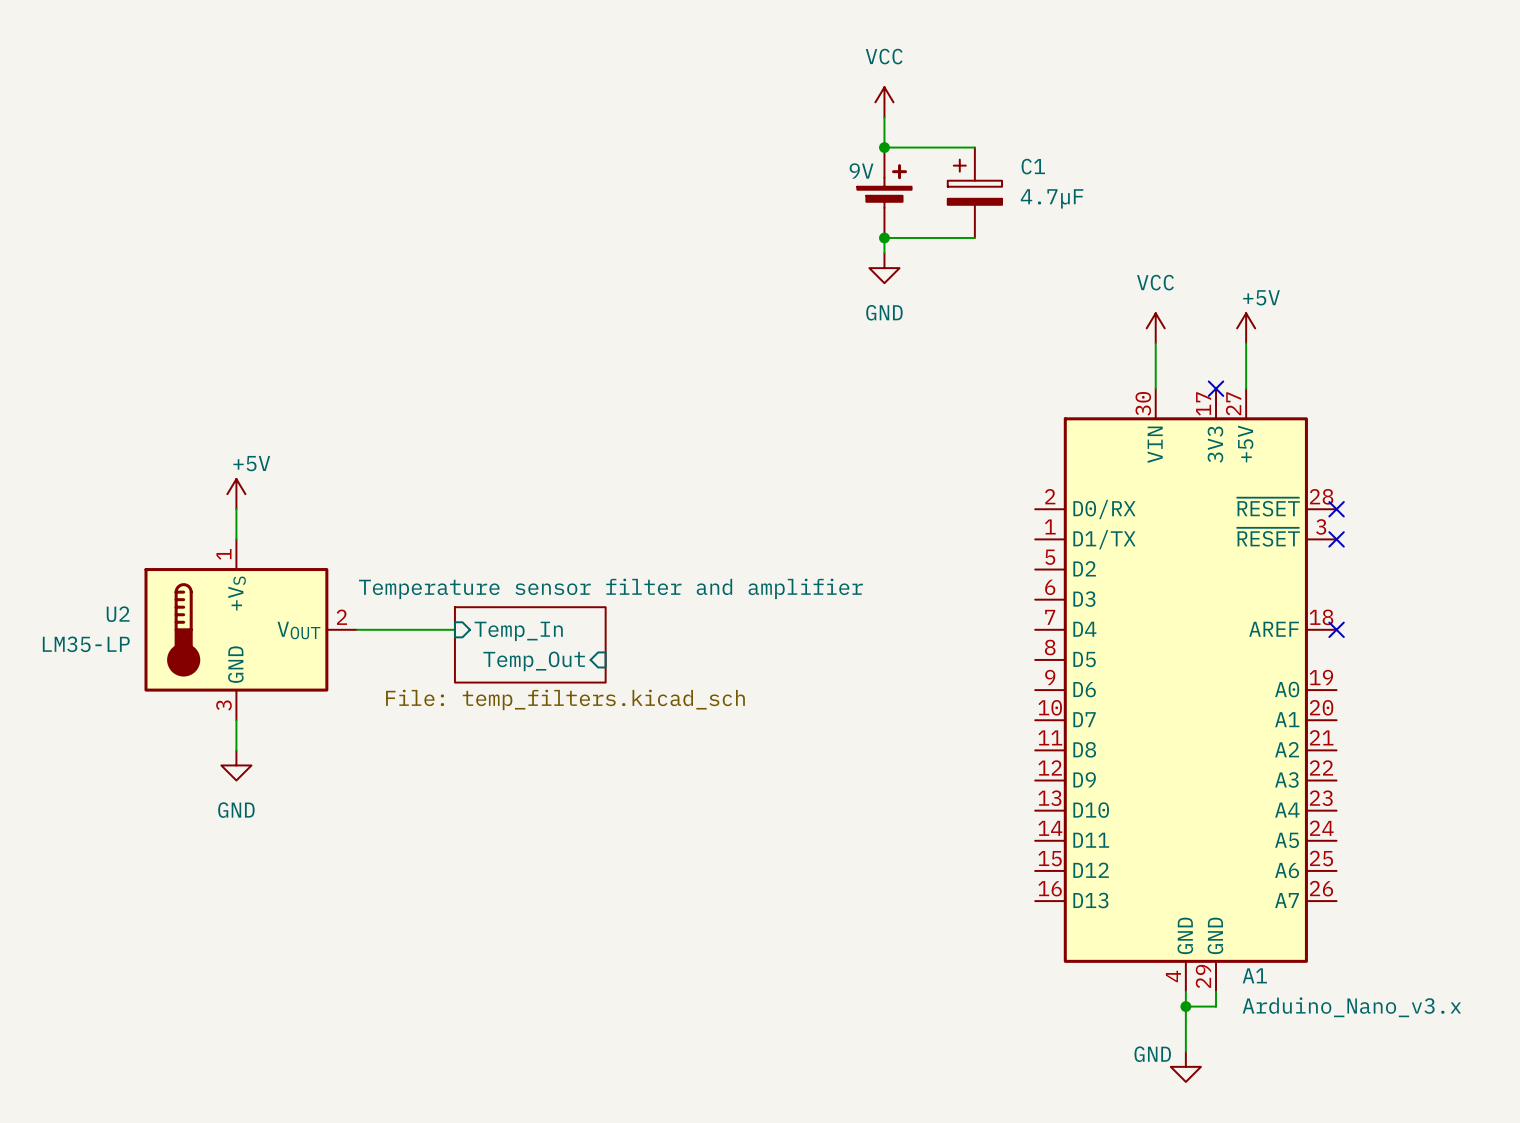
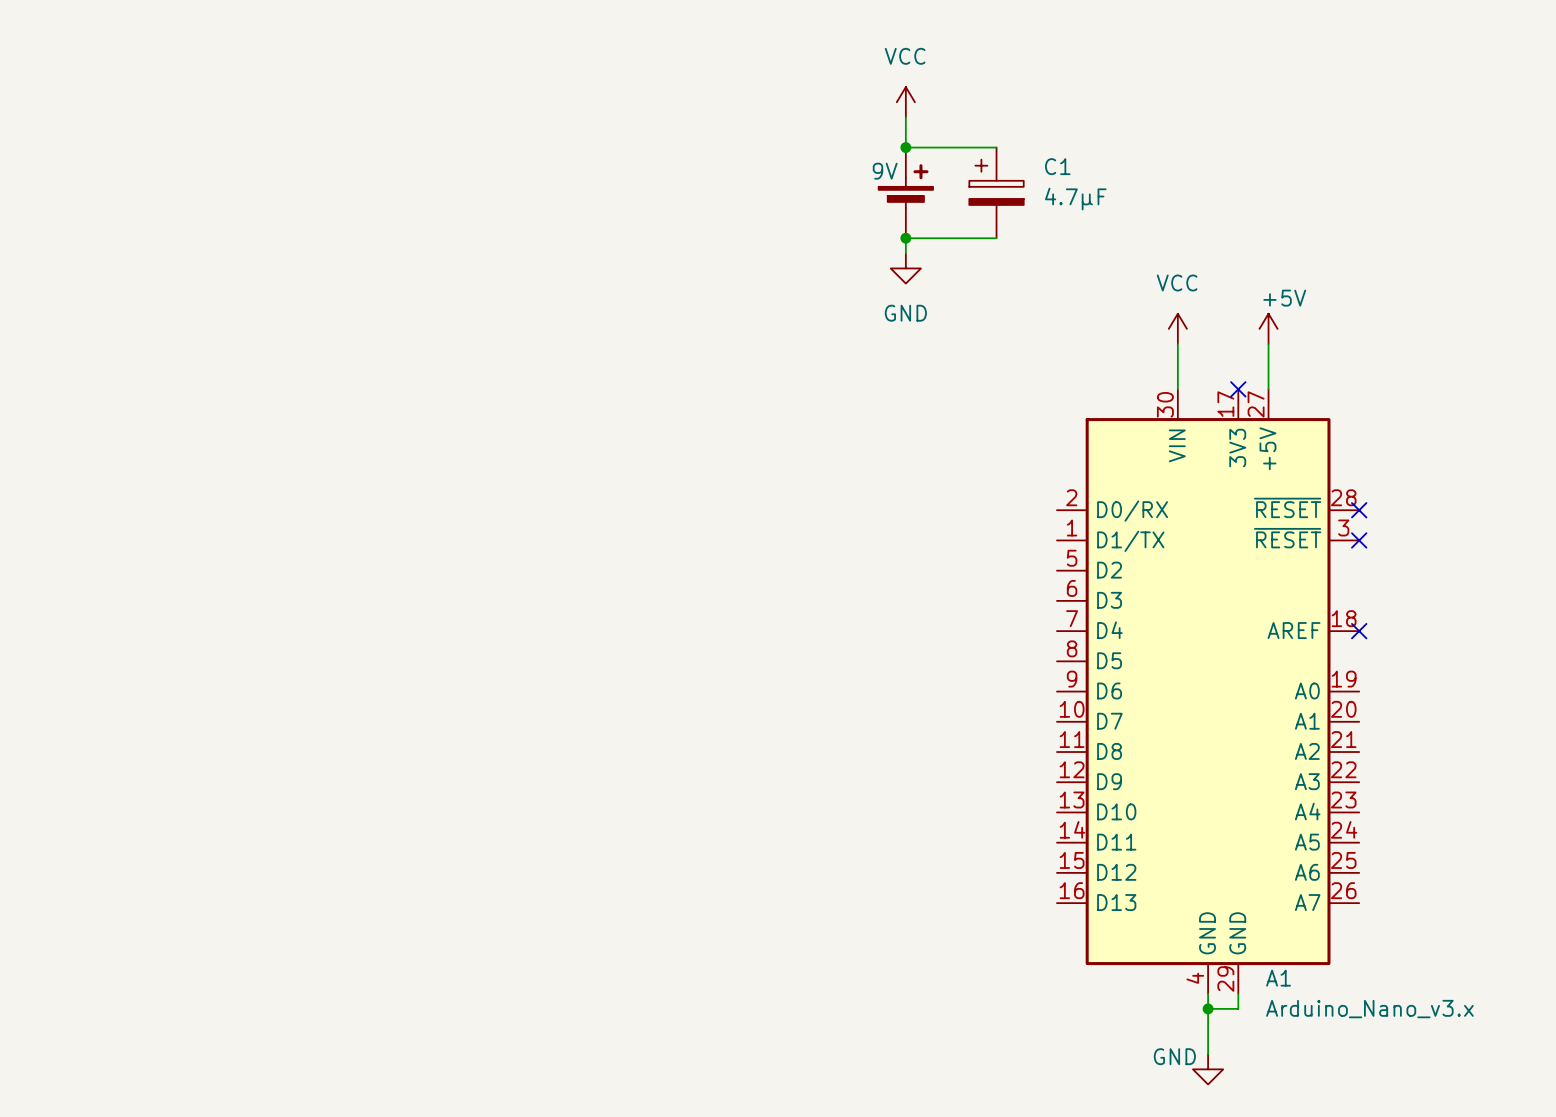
power symbol: +5V (236, 494) -> none
wire: (236, 509) (236, 539) -> none
U2: LM35-LP (250, 629) -> none
wire: (356, 629) (454, 629) -> none
sheet pin: Temp_In (518, 631) -> none
sheet Temperature sensor filter and amplifier: File: temp_filters.kicad_sch (530, 644) -> none
sheet pin: Temp_Out (534, 661) -> none
wire: (236, 720) (236, 750) -> none
power symbol: GND (236, 765) -> none

